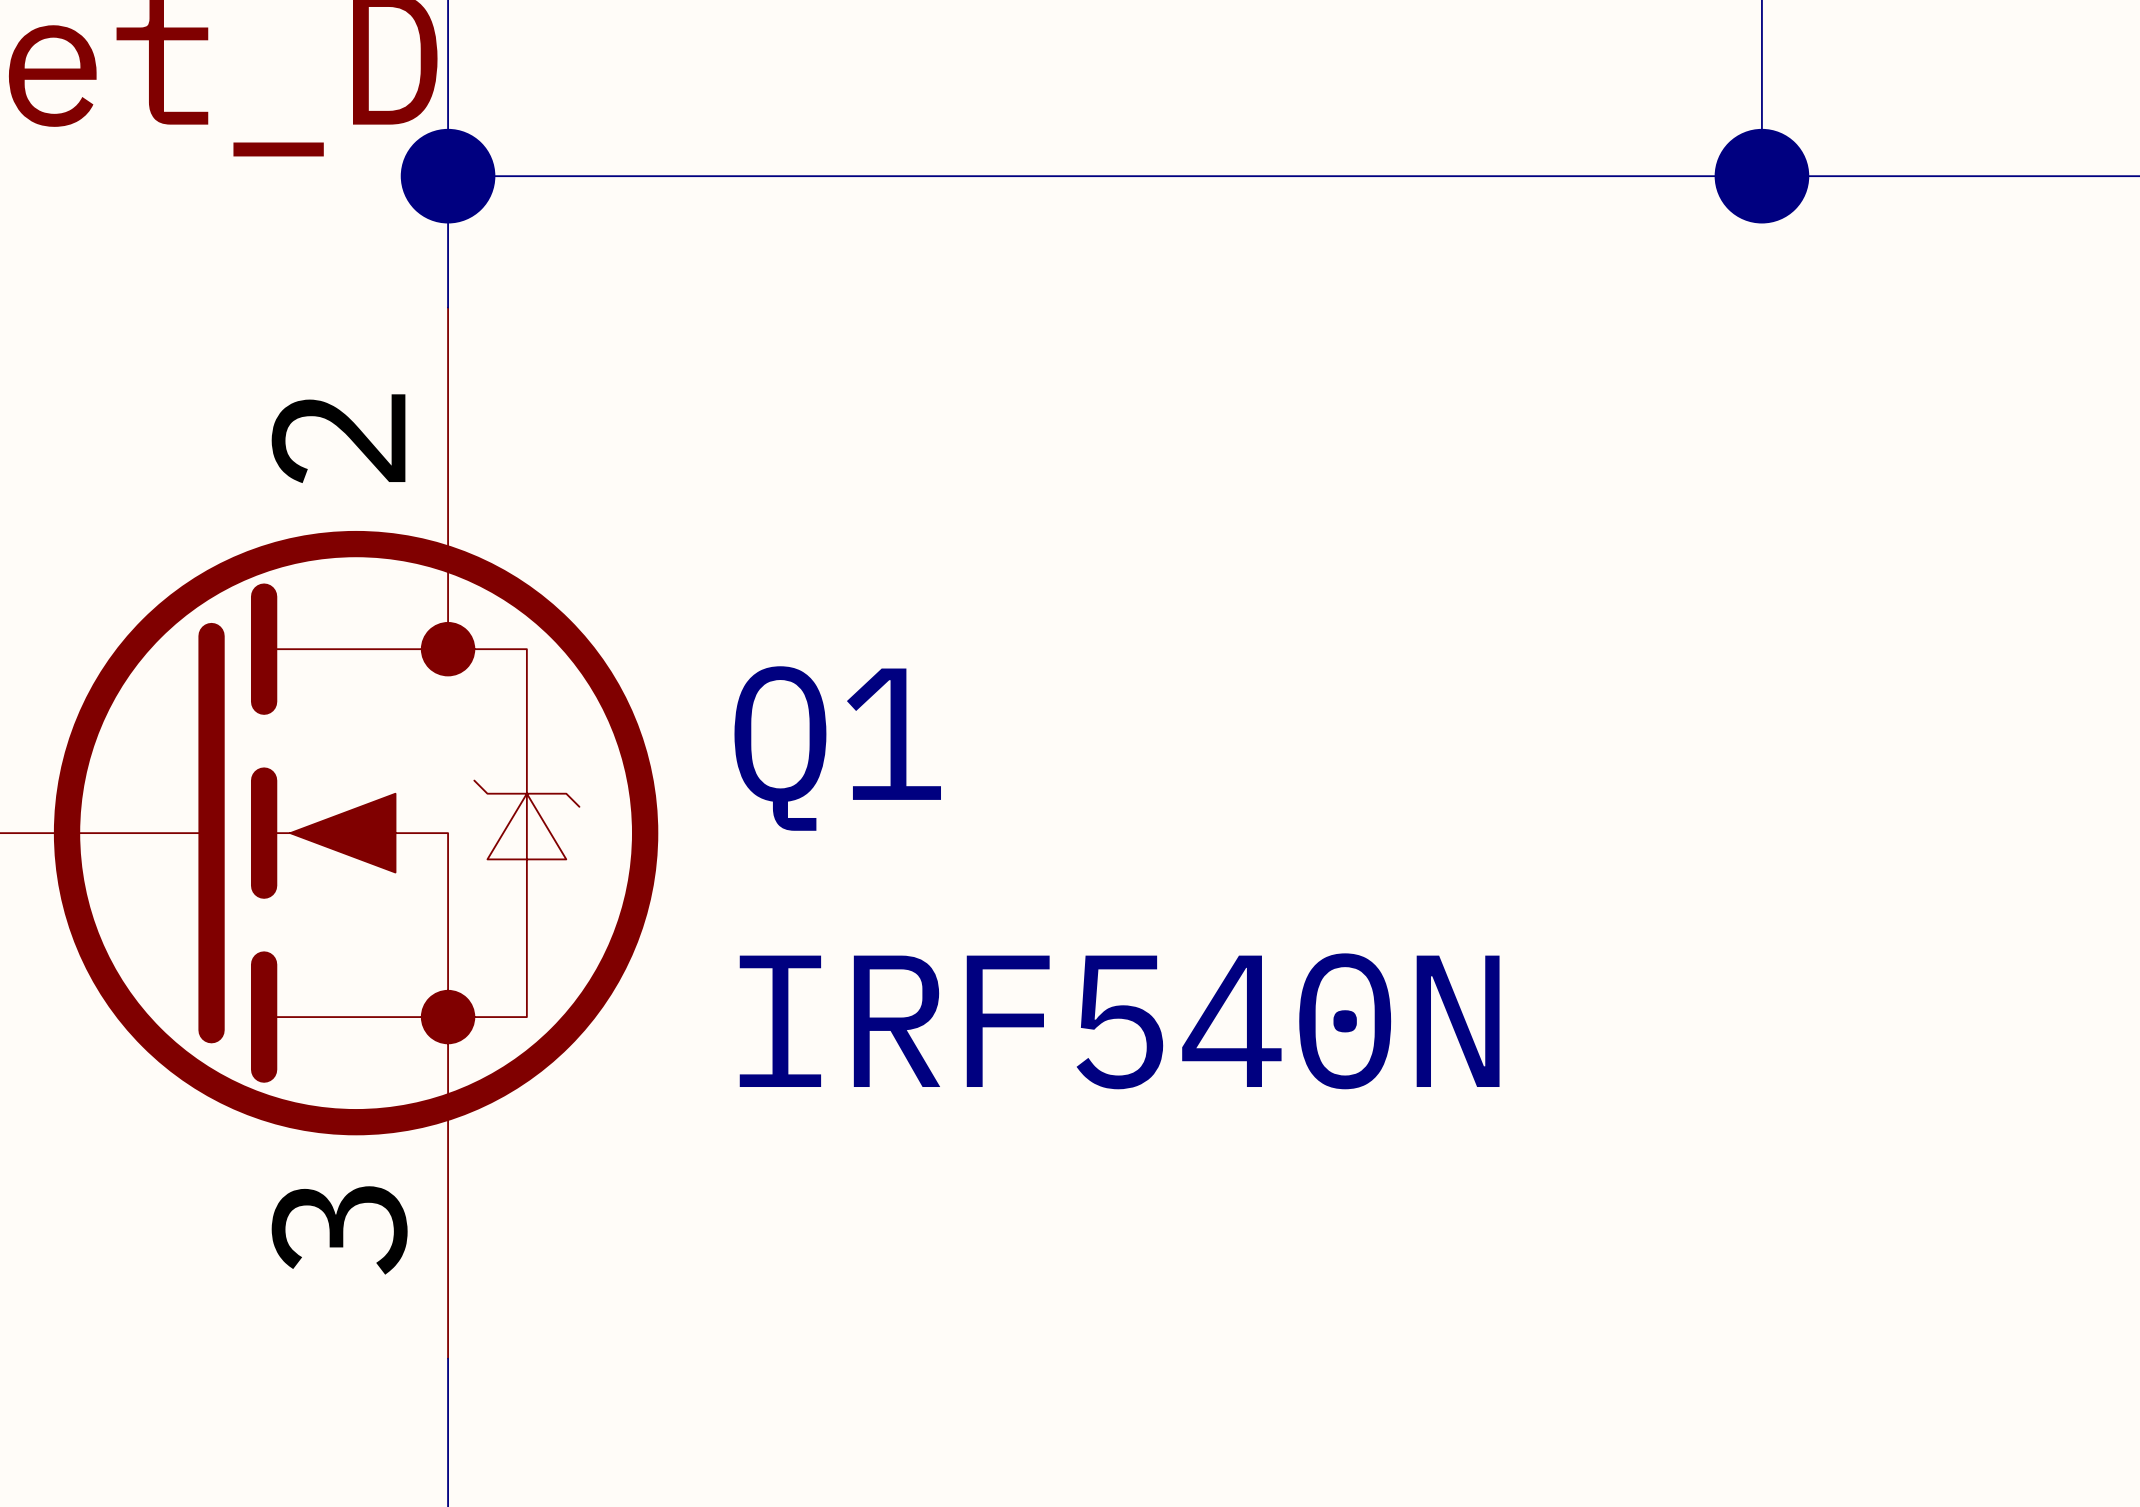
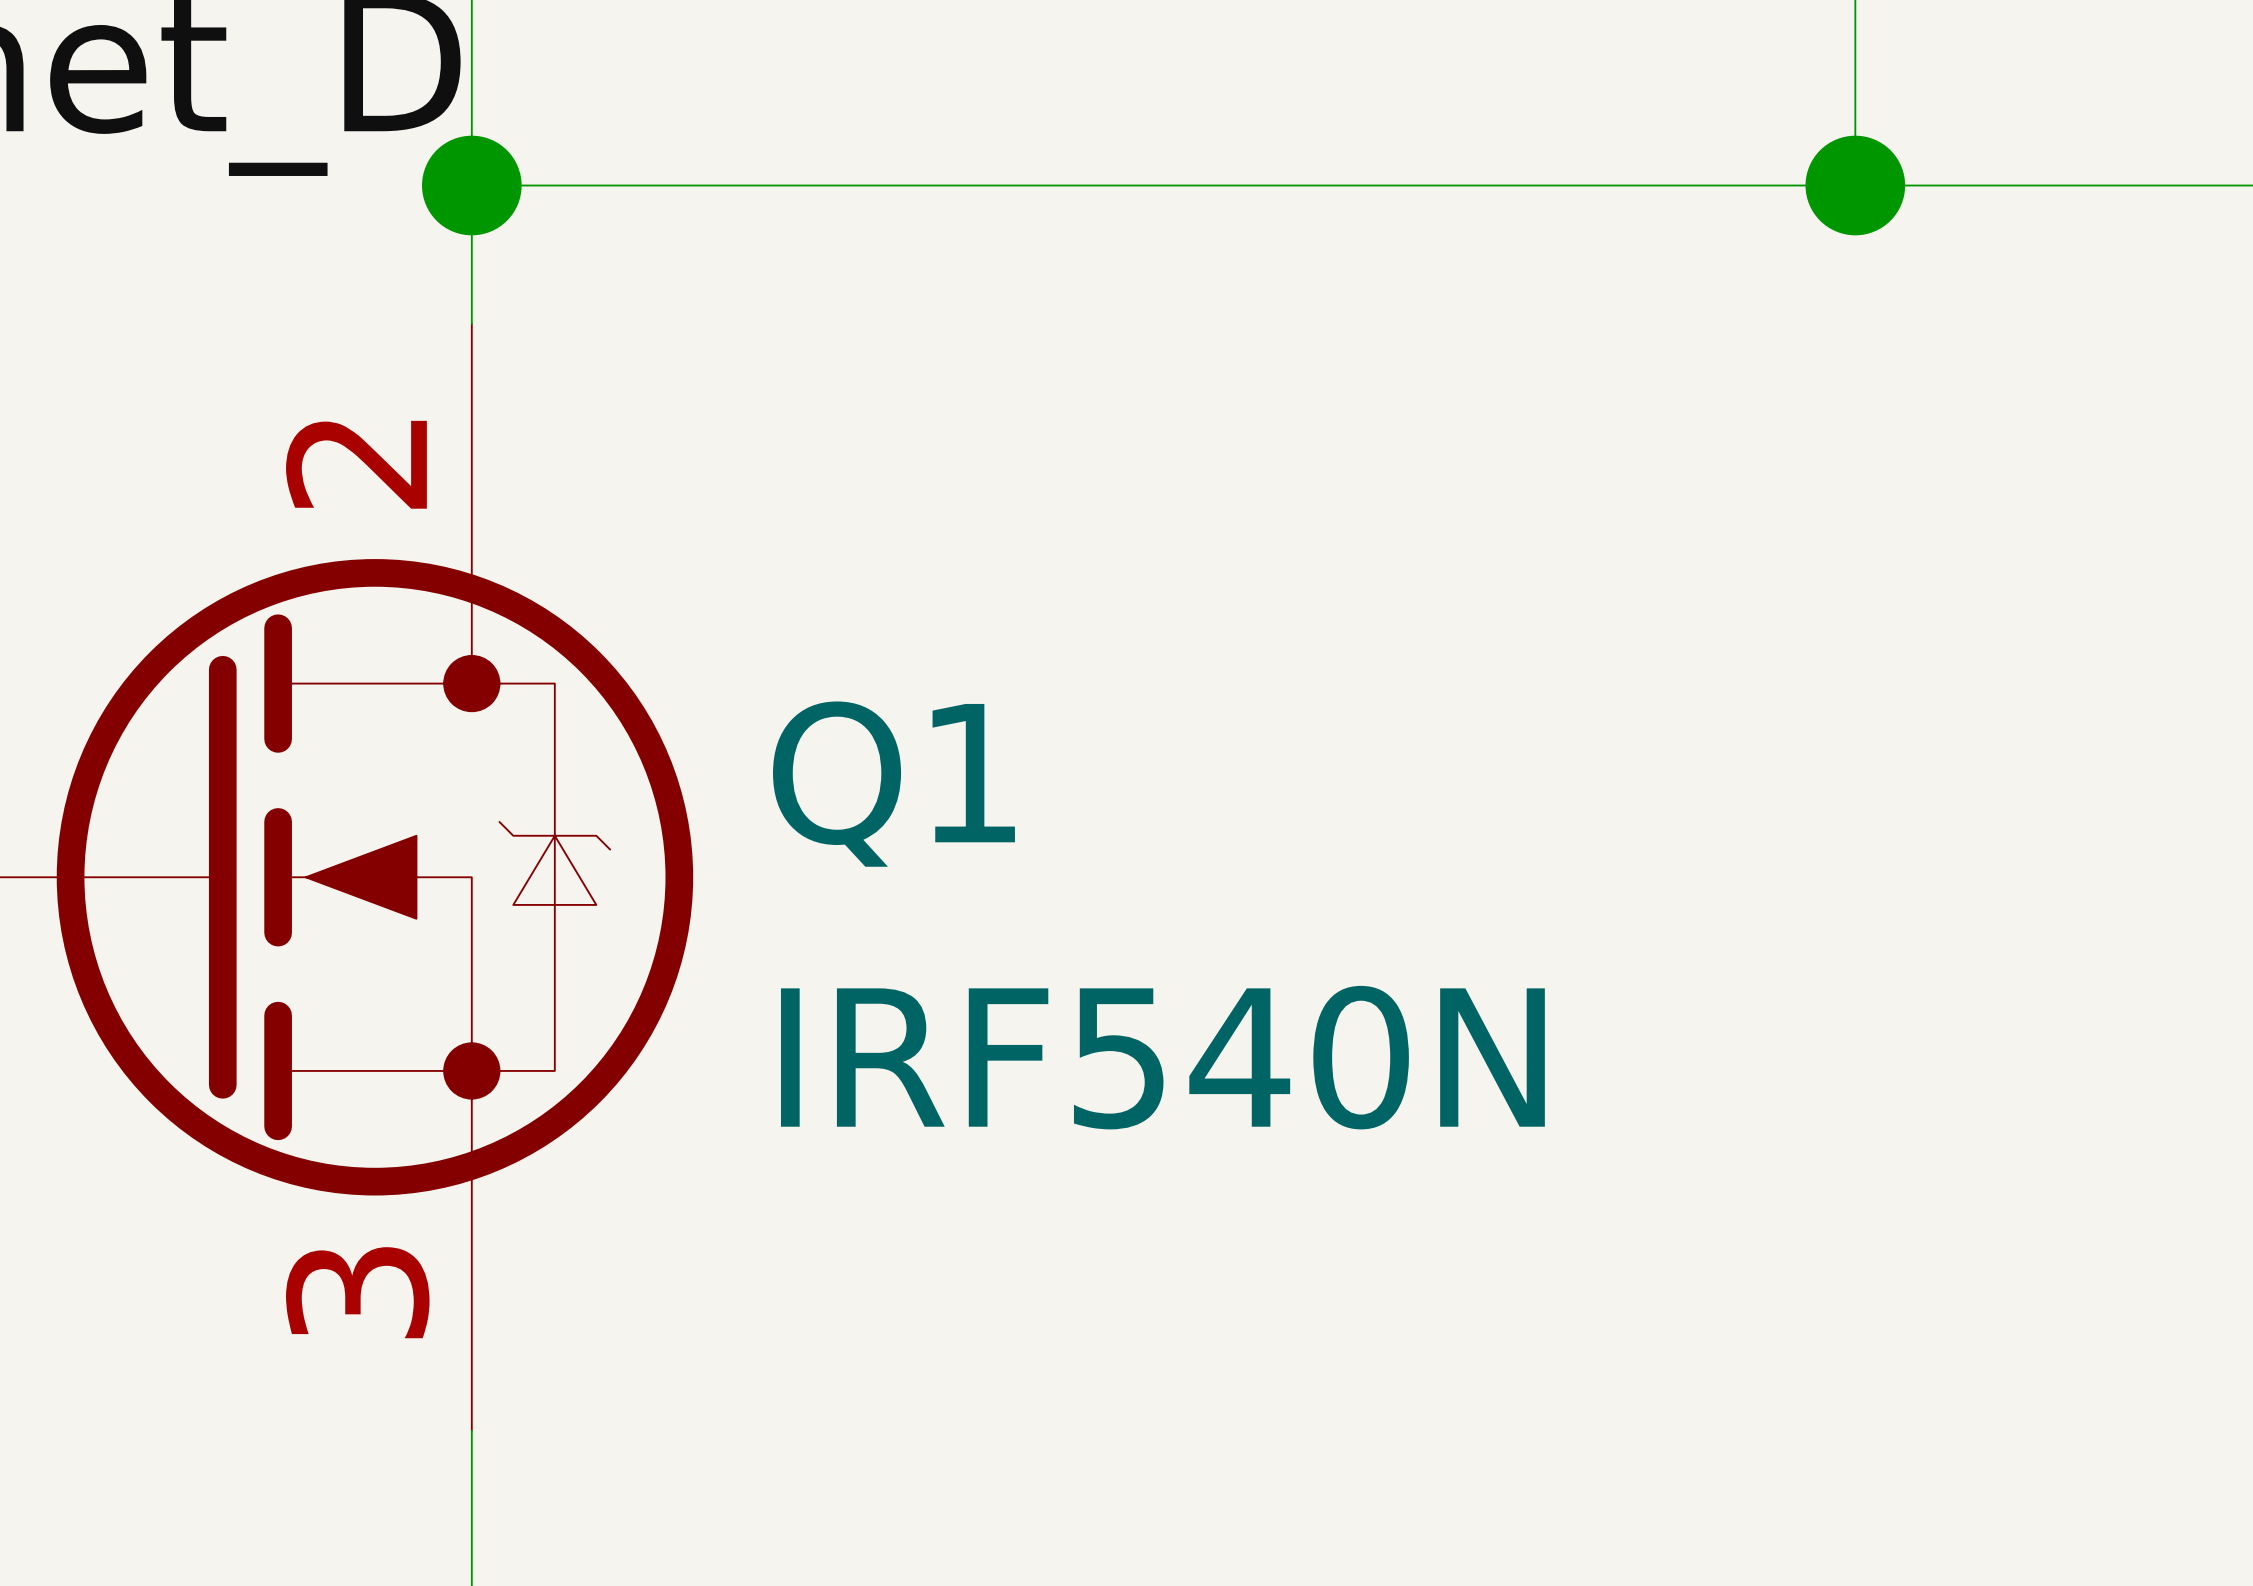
Q1 value position: IRF540N (1119, 1021) -> IRF540N (1162, 1057)

